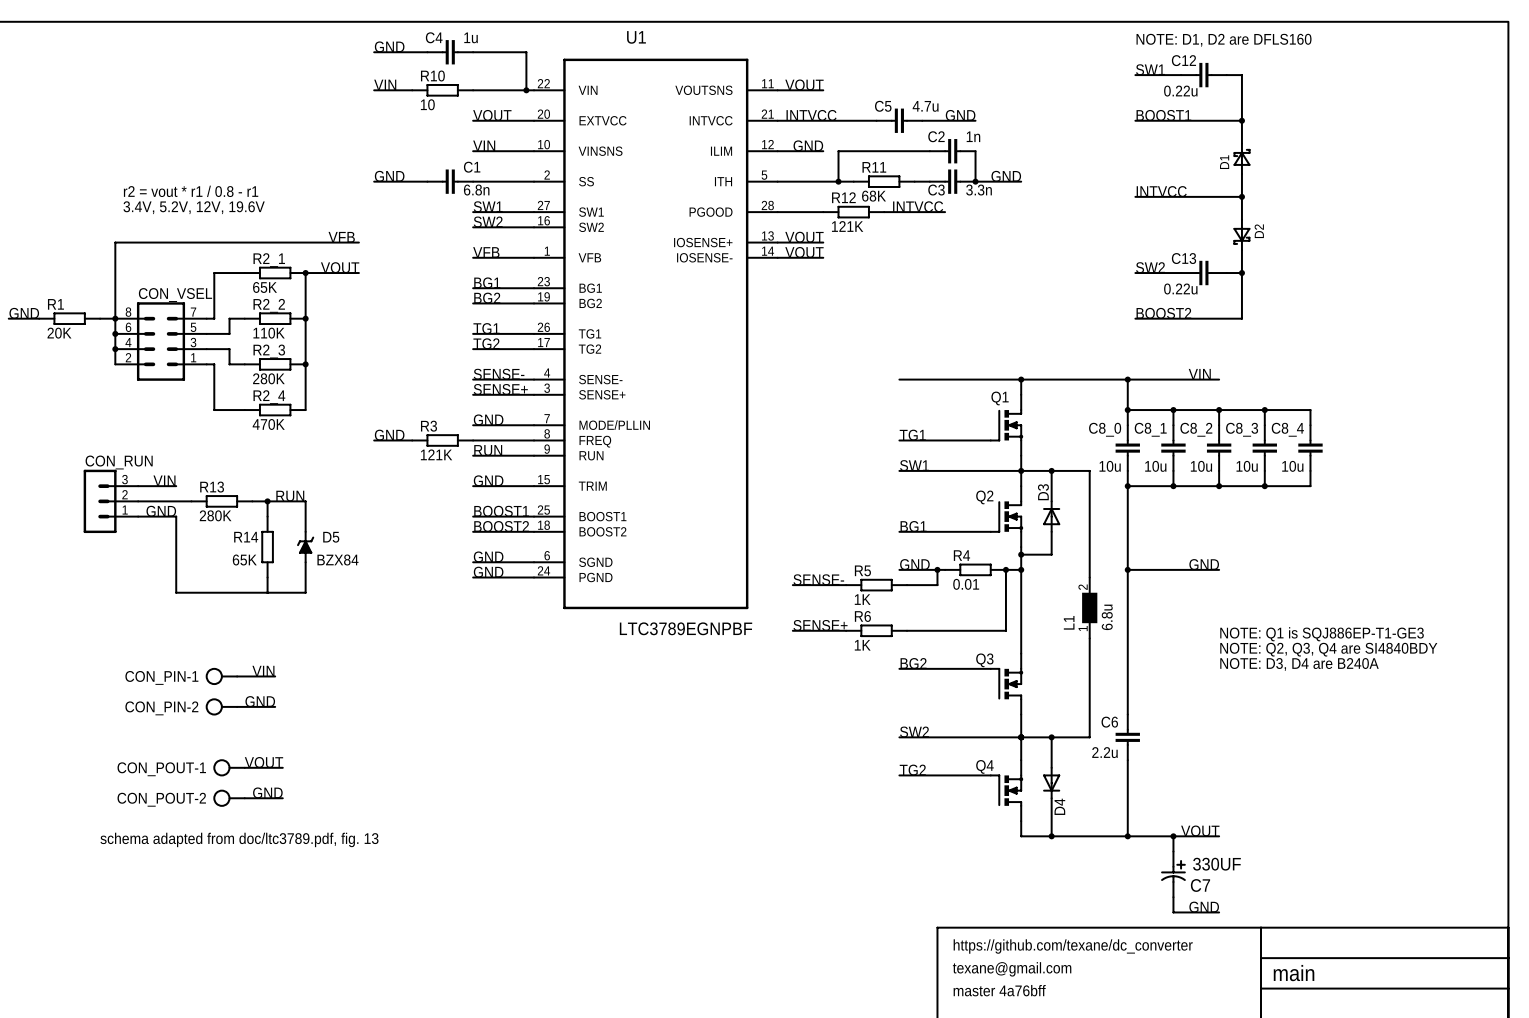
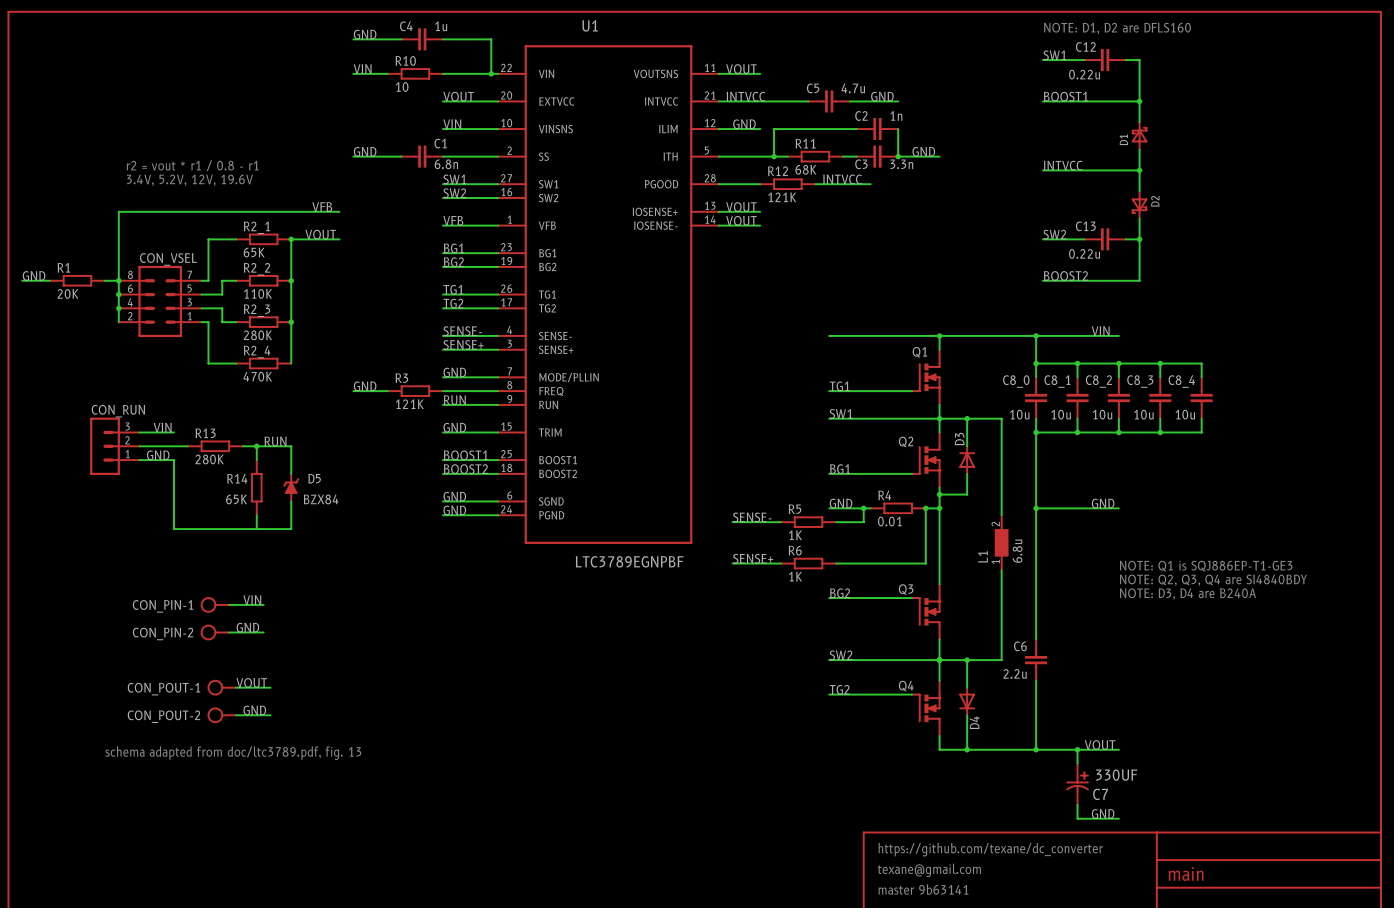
text: master 4a76bff (999, 990) -> master 9b63141 (923, 889)

